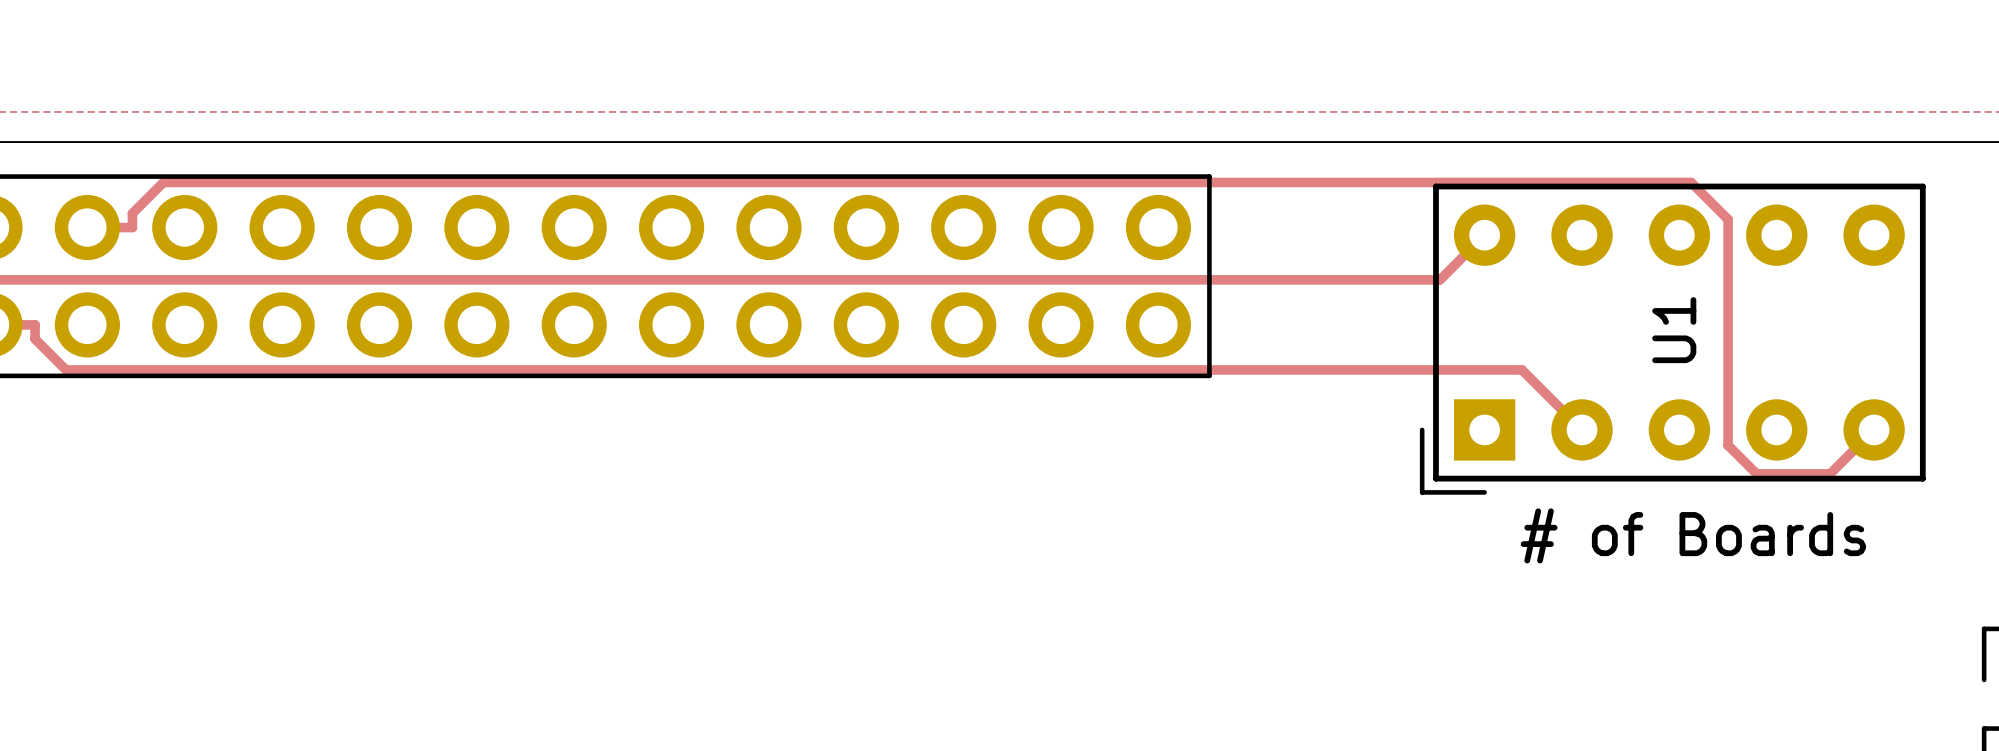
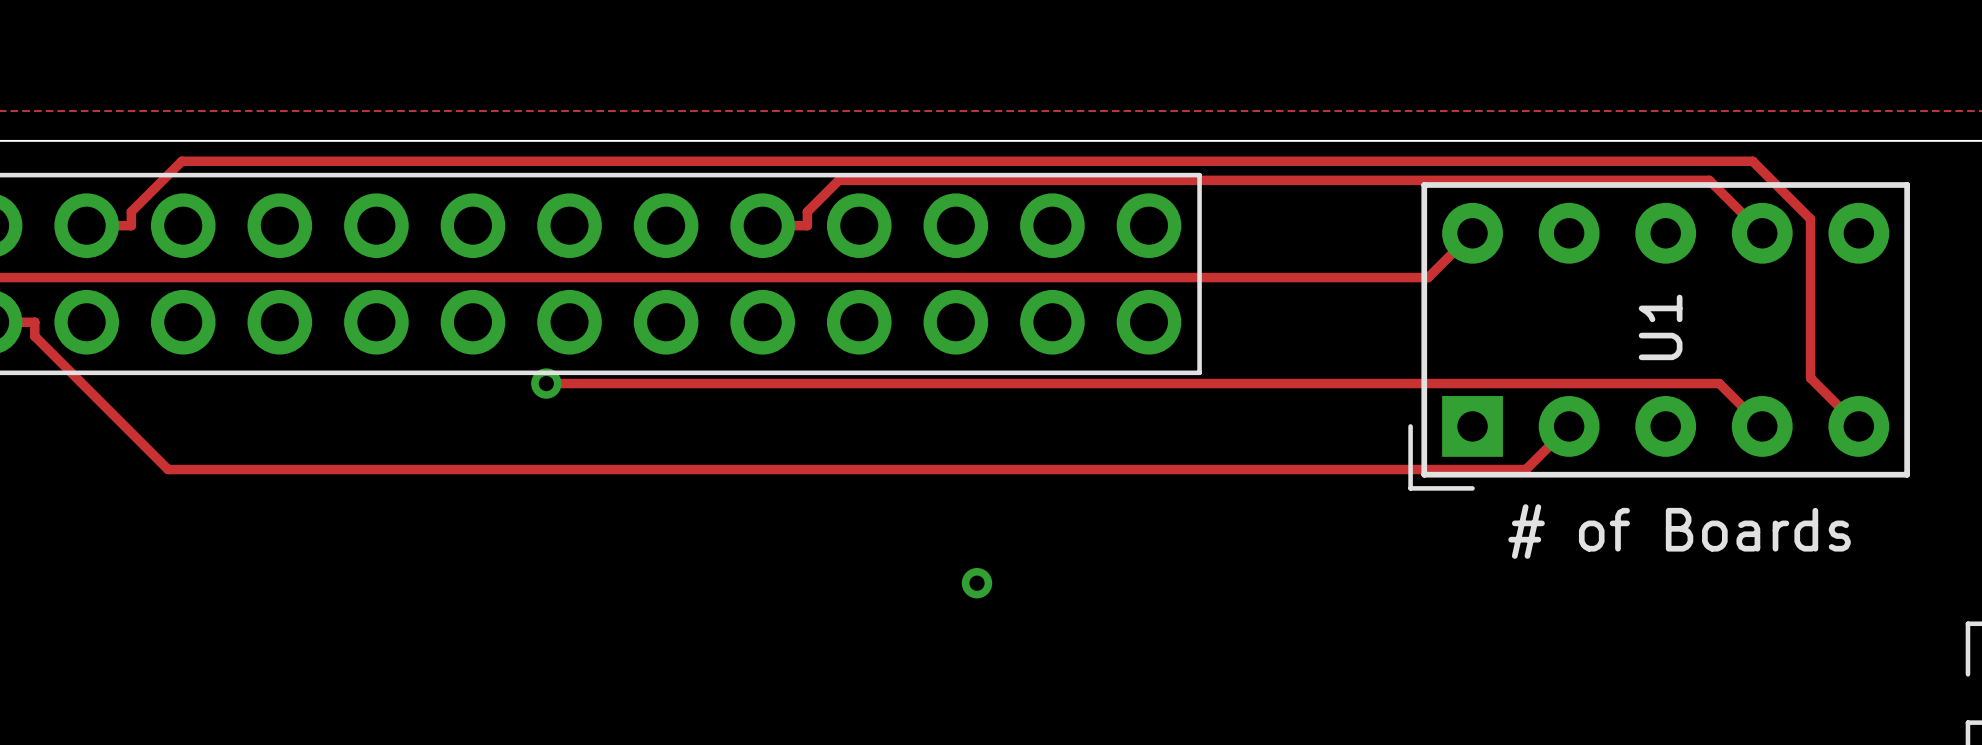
top track: (163, 182) (1691, 182) (1728, 219) (1728, 445) (1756, 473) (1830, 473) (1874, 429) -> (162, 180) (181, 161) (1752, 161) (1810, 219) (1810, 378) (1858, 426)
top track: none -> (762, 225) (807, 225) (807, 211) (838, 180) (1709, 180) (1762, 233)
top track: (66, 369) (1522, 369) (1582, 429) -> (65, 366) (168, 469) (1526, 469) (1569, 426)
top track: none -> (546, 383) (1719, 383) (1762, 426)
via: none -> (546, 383)
via: none -> (977, 583)

